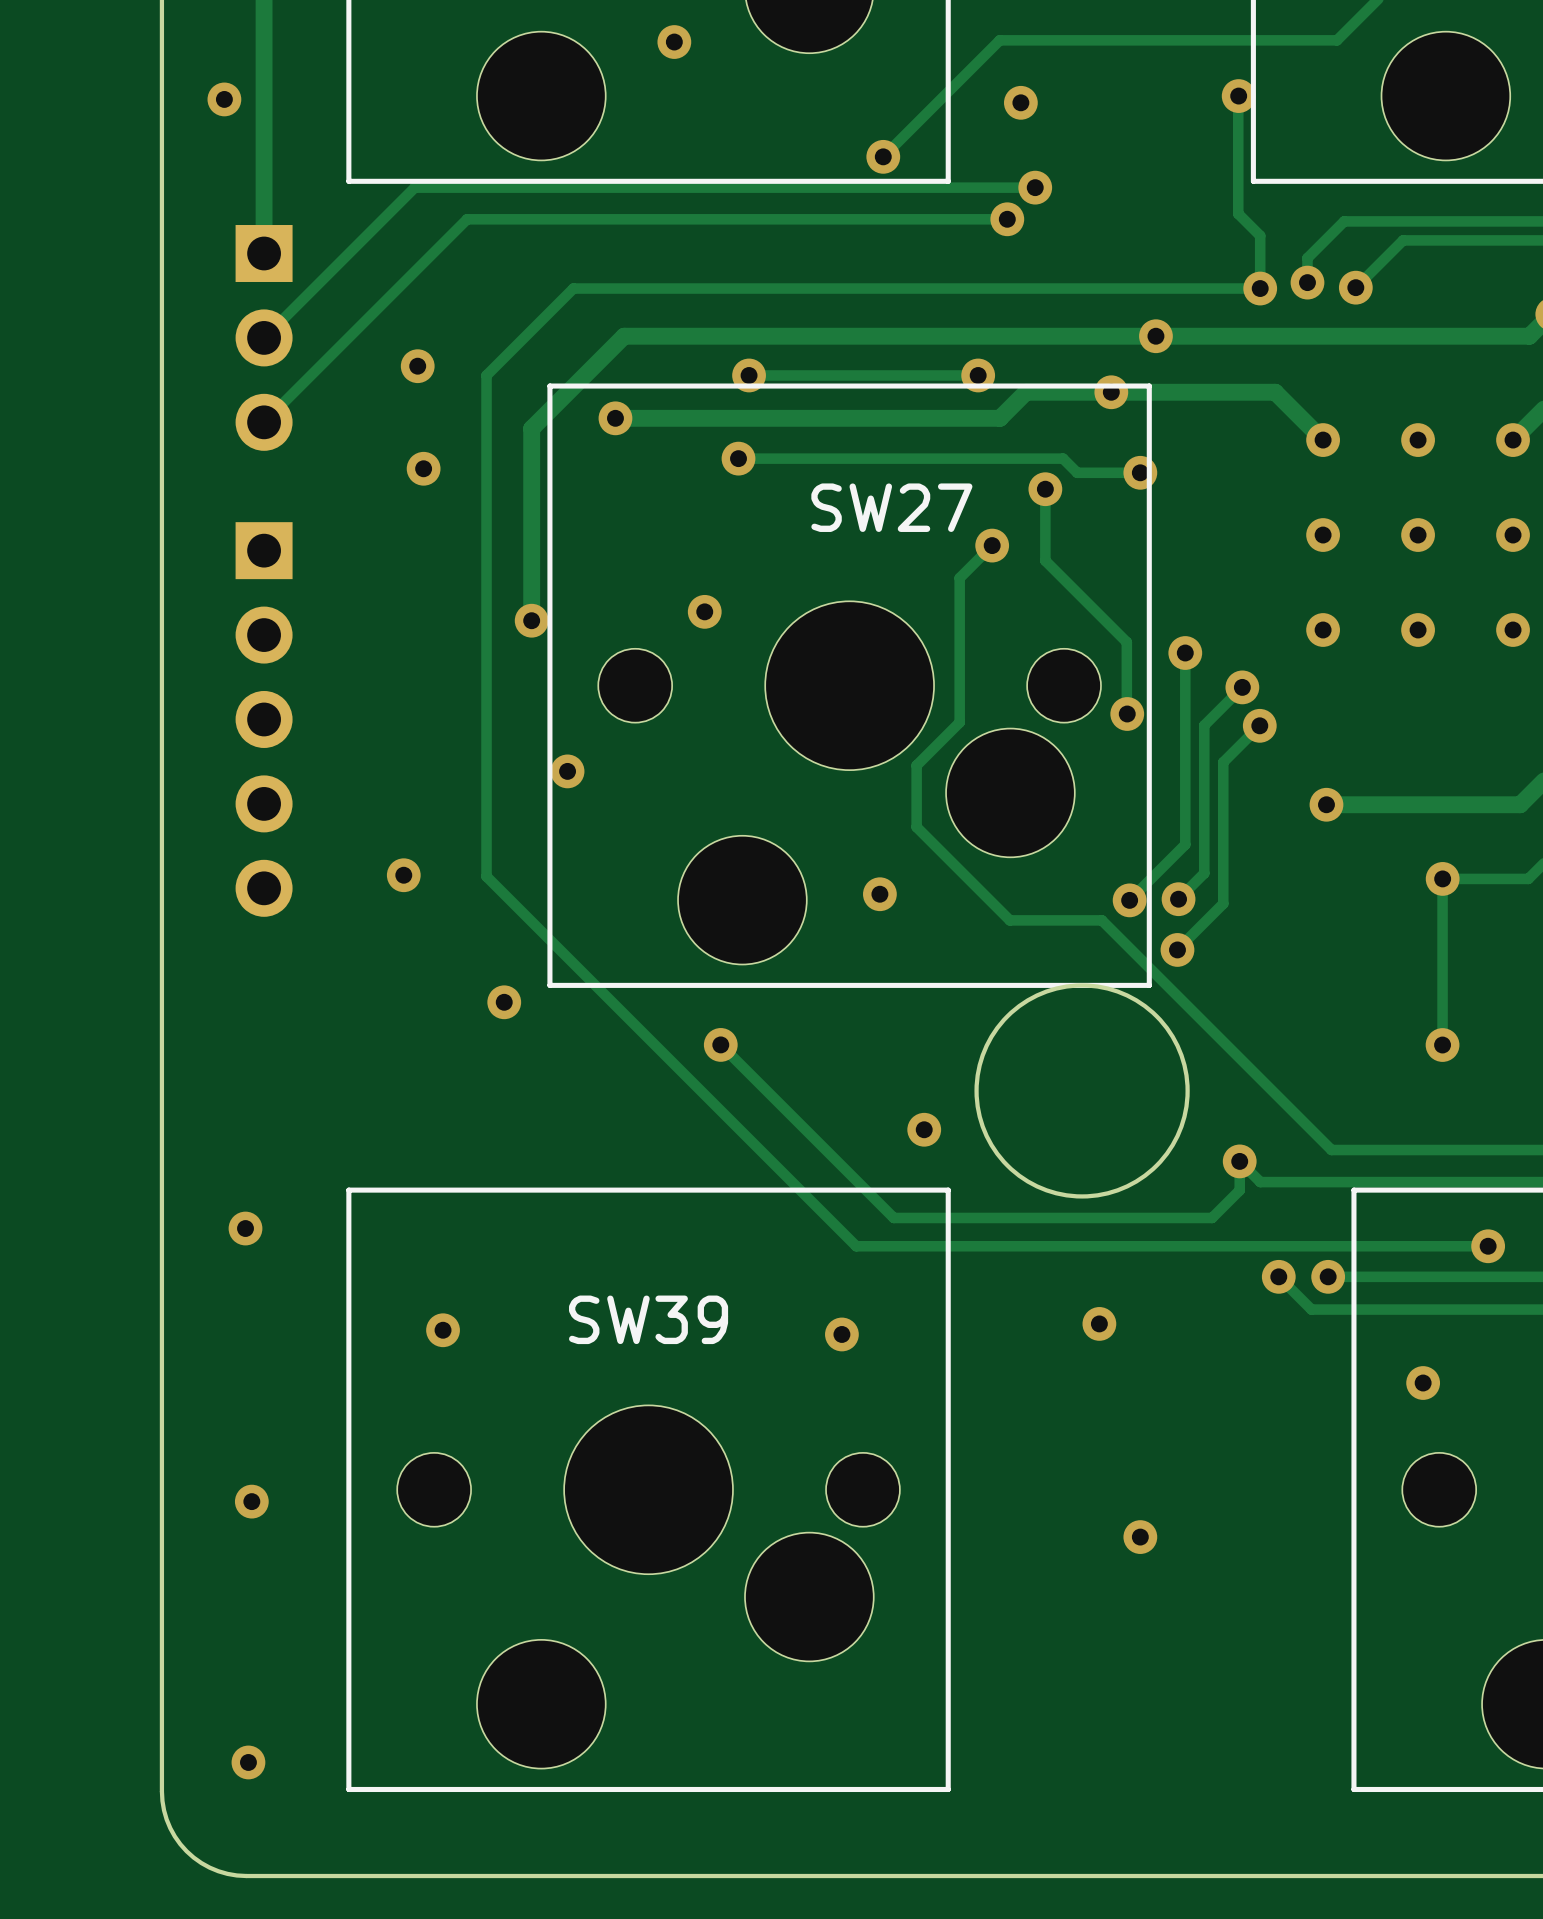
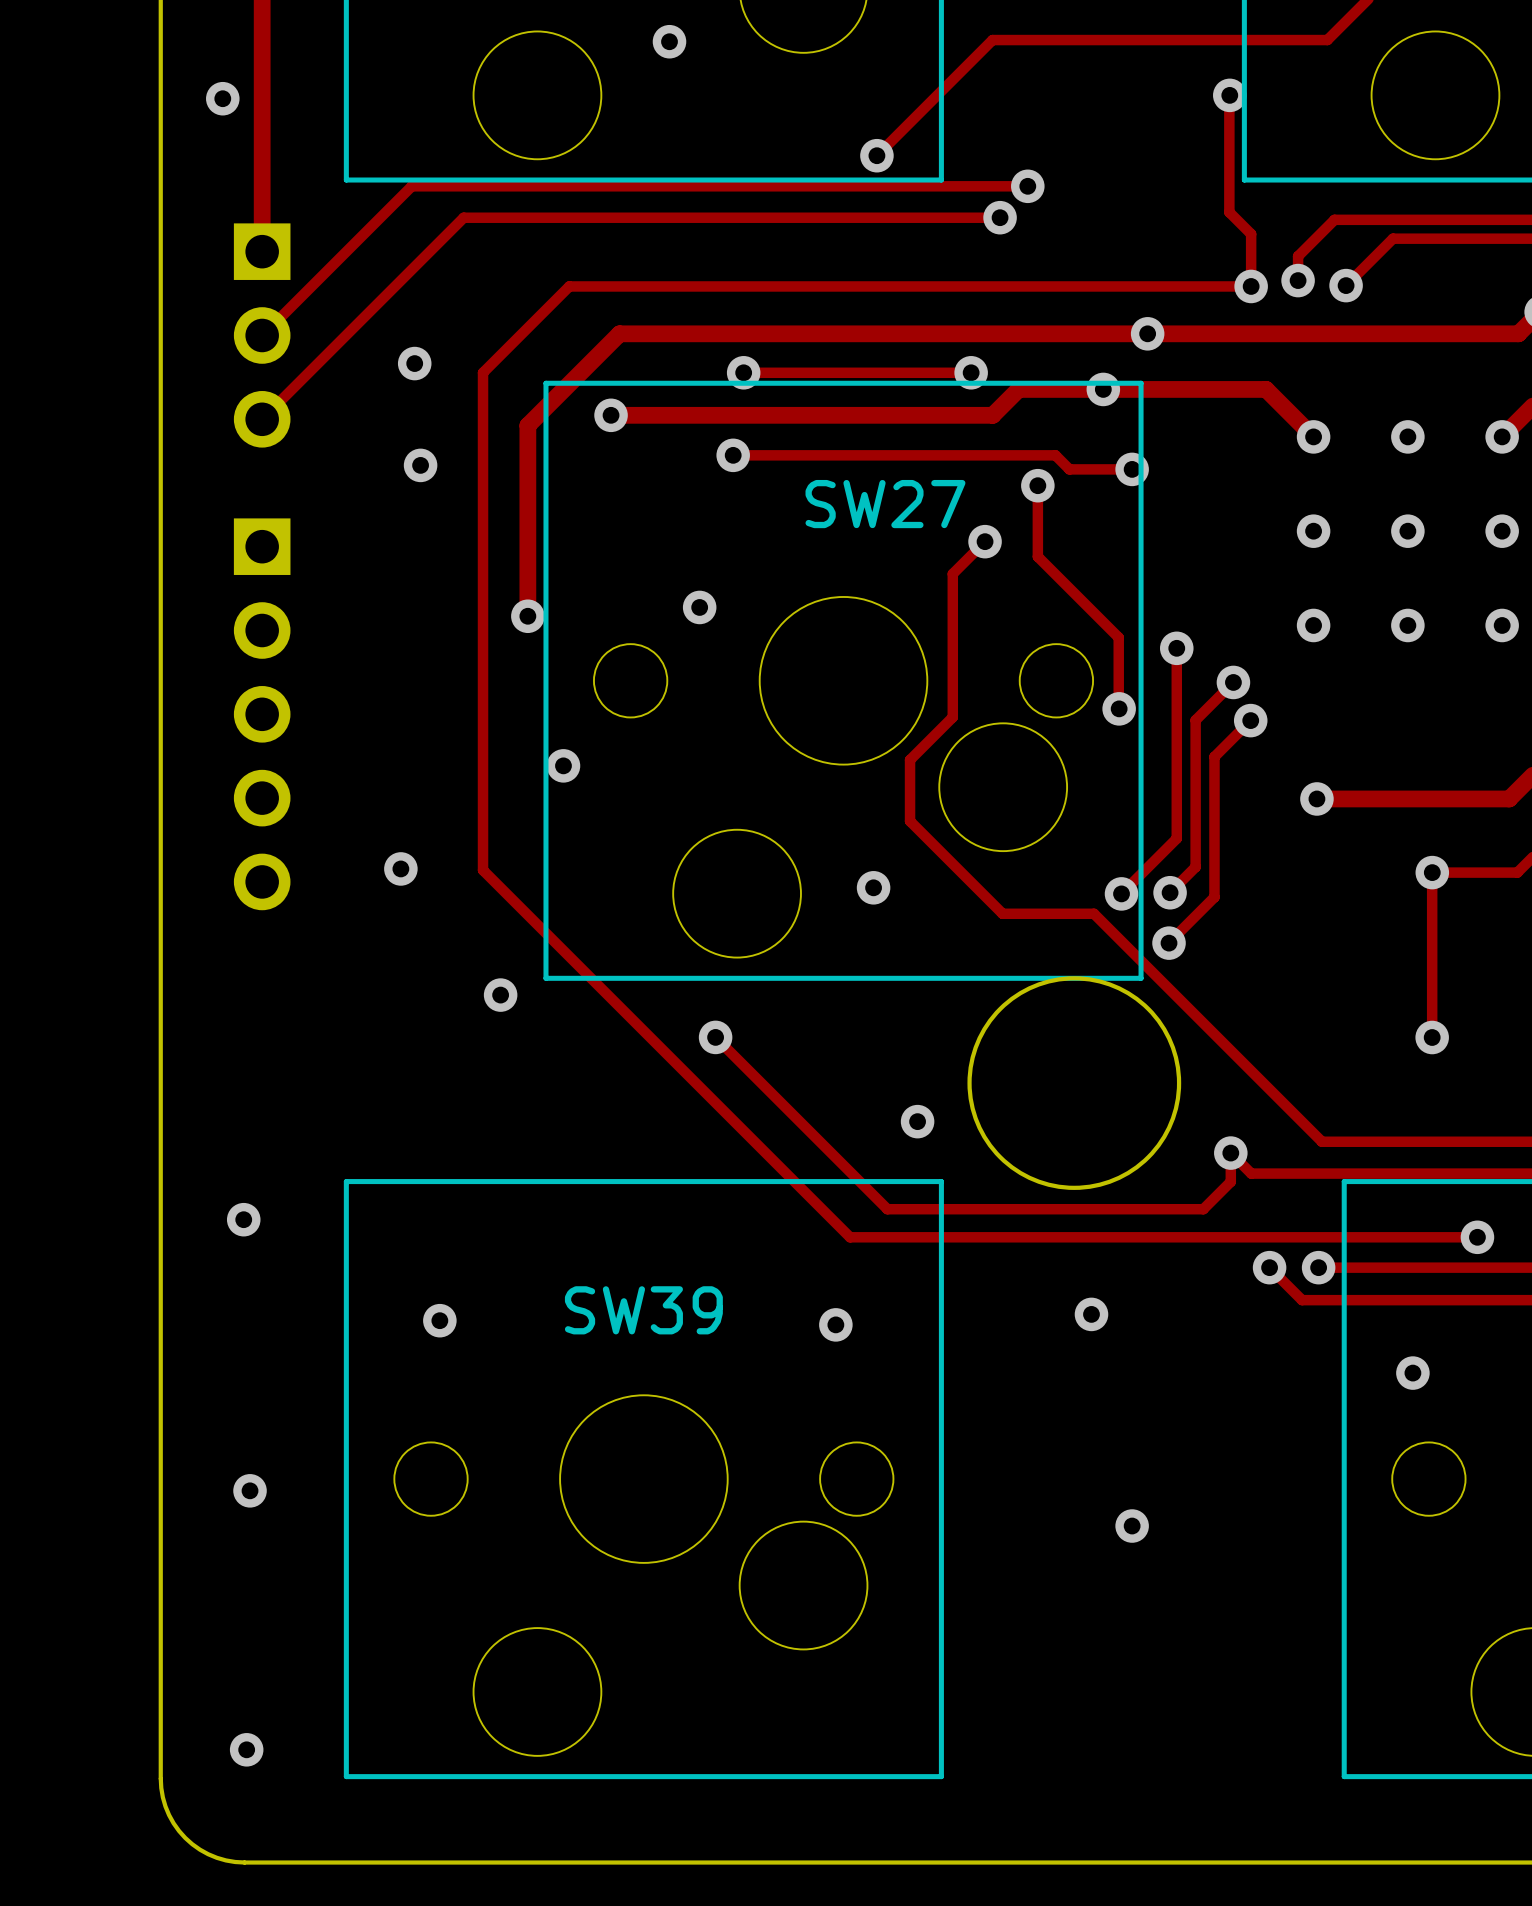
via: (1020, 102) -> none

